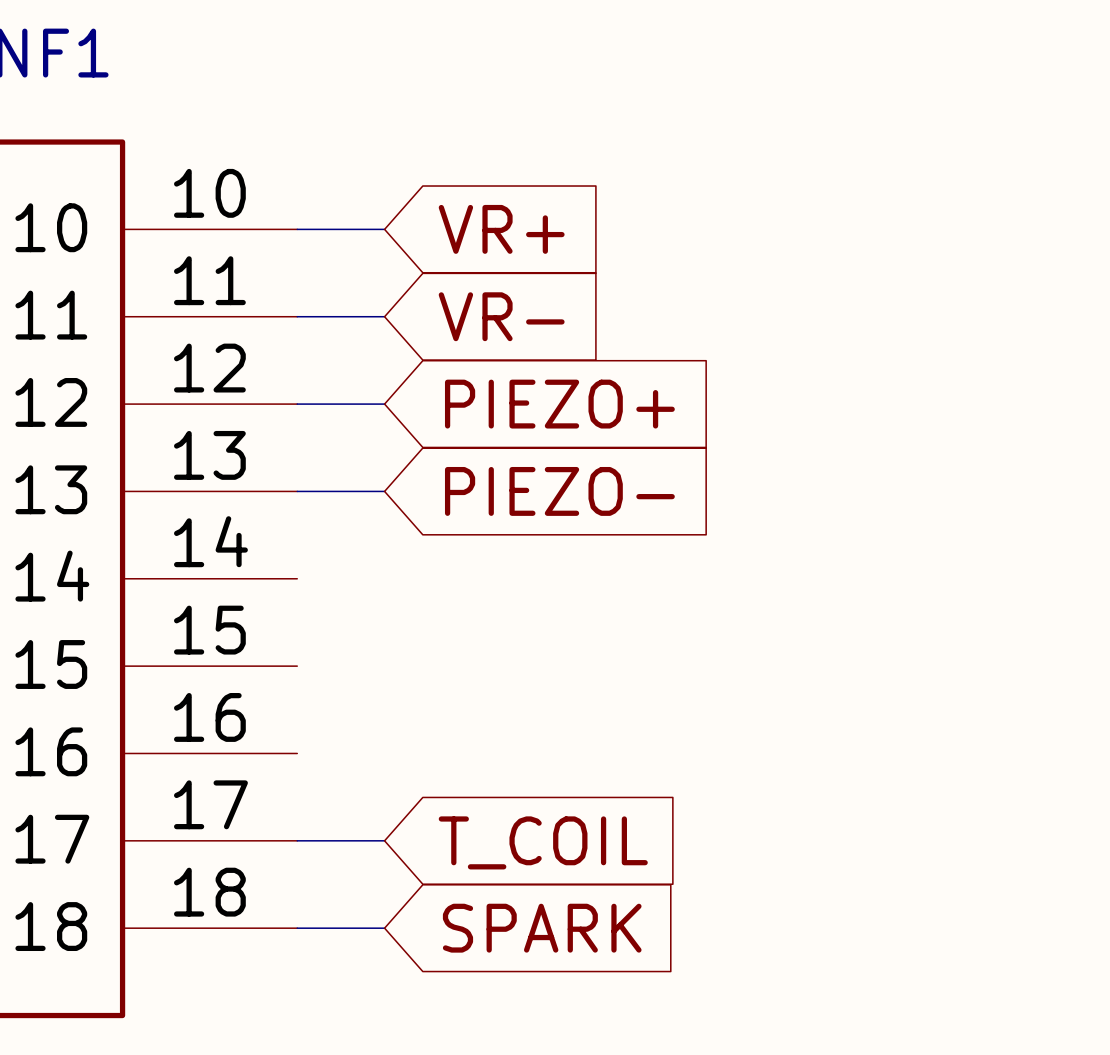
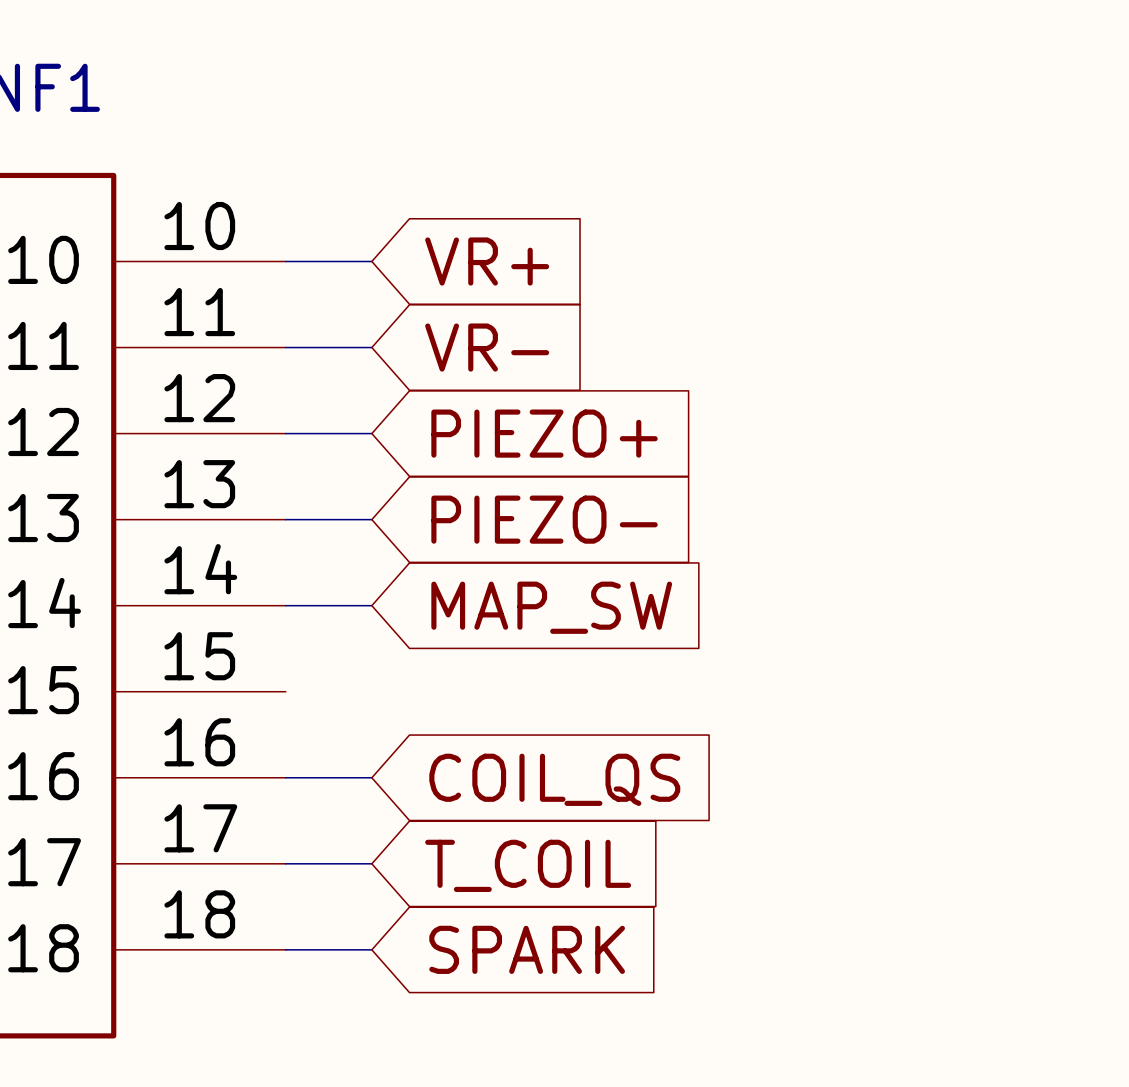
wire: none -> (285, 605) (371, 605)
global label: none -> MAP_SW (551, 607)
wire: none -> (285, 777) (371, 777)
global label: none -> COIL_QS (554, 779)

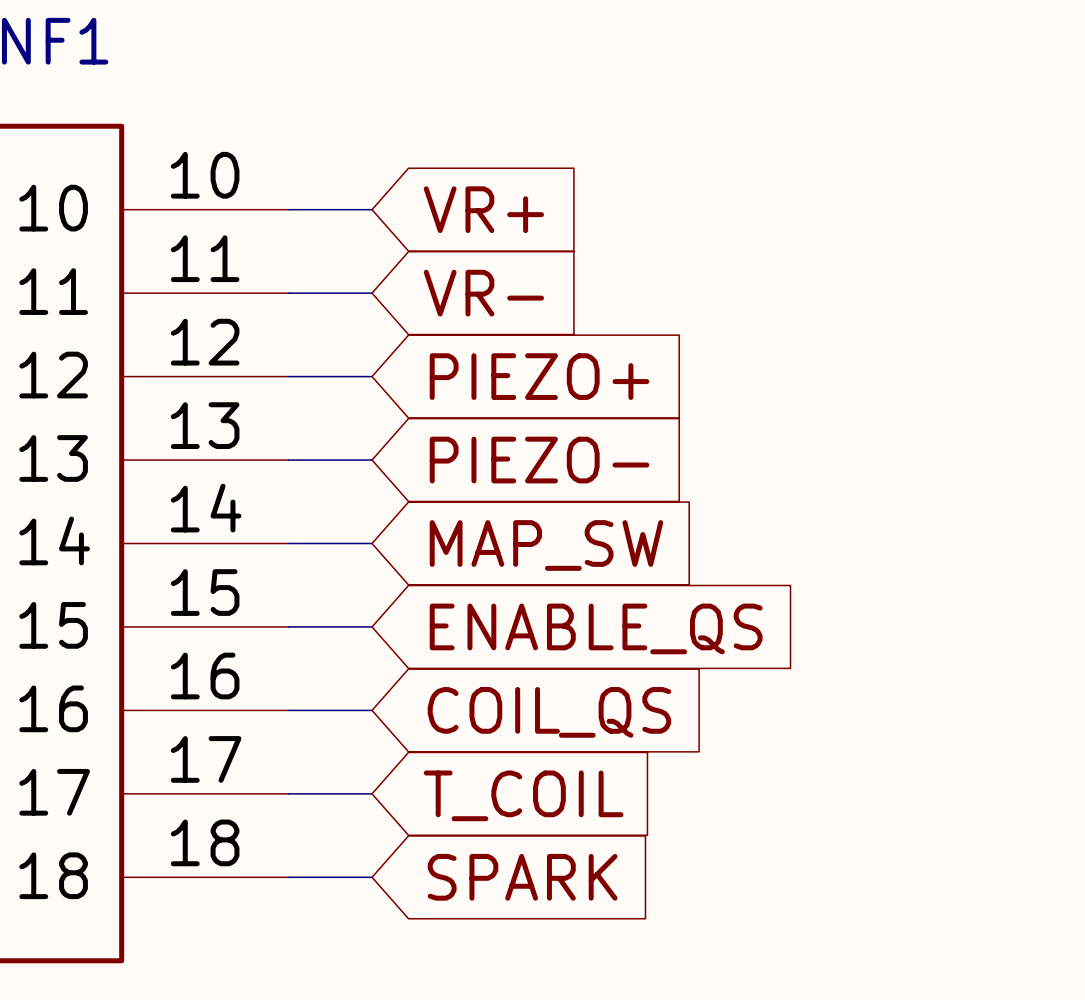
wire: none -> (288, 626) (372, 626)
global label: none -> ENABLE_QS (596, 628)

